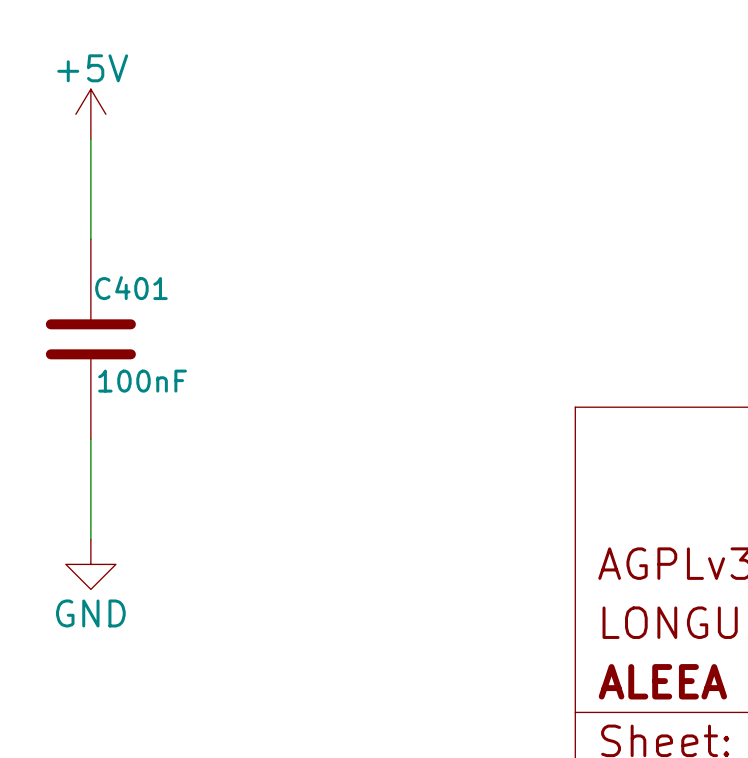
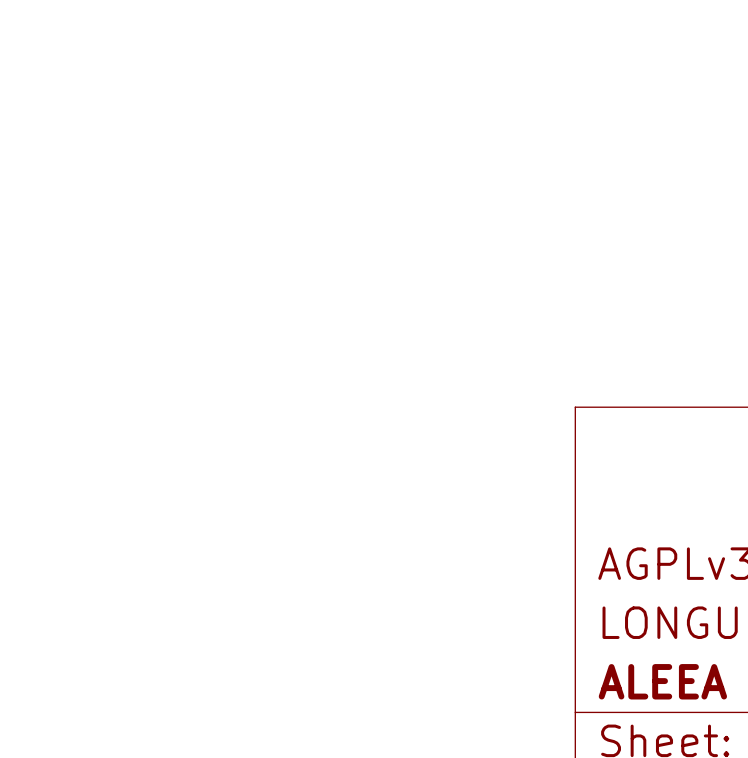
power symbol: +5V (90, 114) -> none
wire: (90, 139) (90, 239) -> none
C401: 100nF (90, 339) -> none
wire: (90, 439) (90, 539) -> none
power symbol: GND (90, 564) -> none

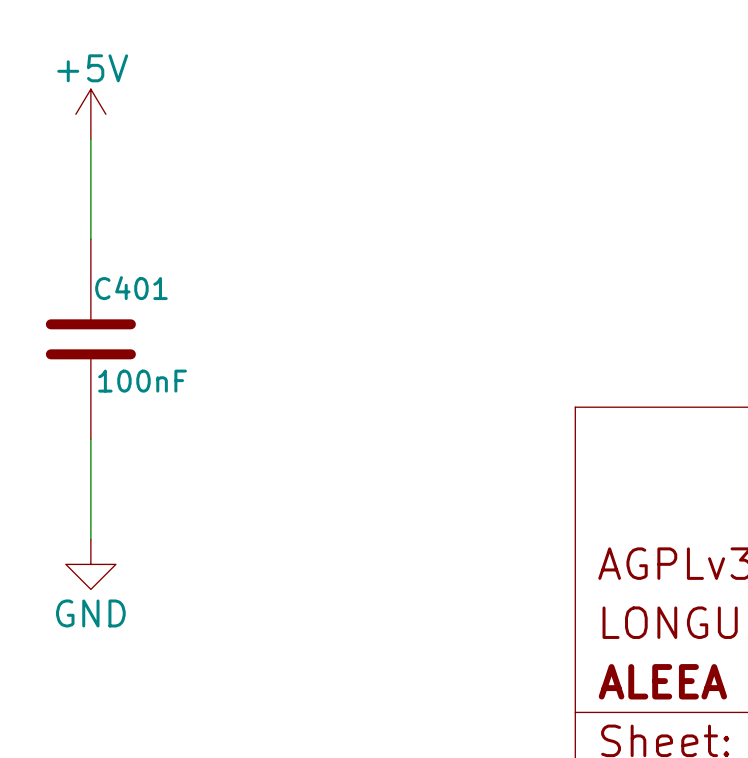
power symbol: none -> +5V (90, 114)
wire: none -> (90, 139) (90, 239)
C401: none -> 100nF (90, 339)
wire: none -> (90, 439) (90, 539)
power symbol: none -> GND (90, 564)

